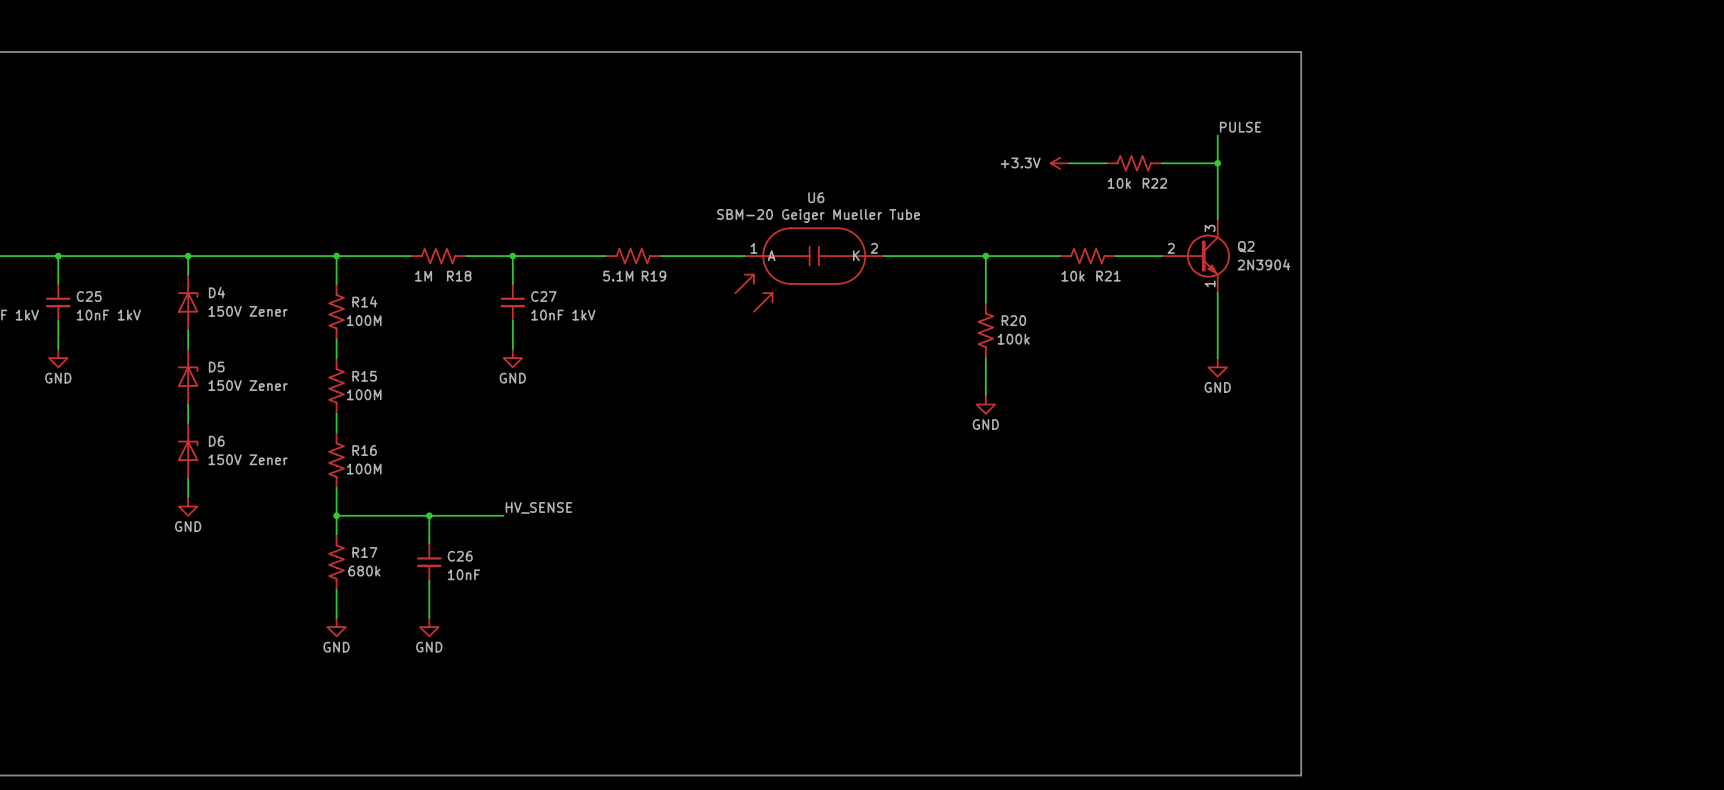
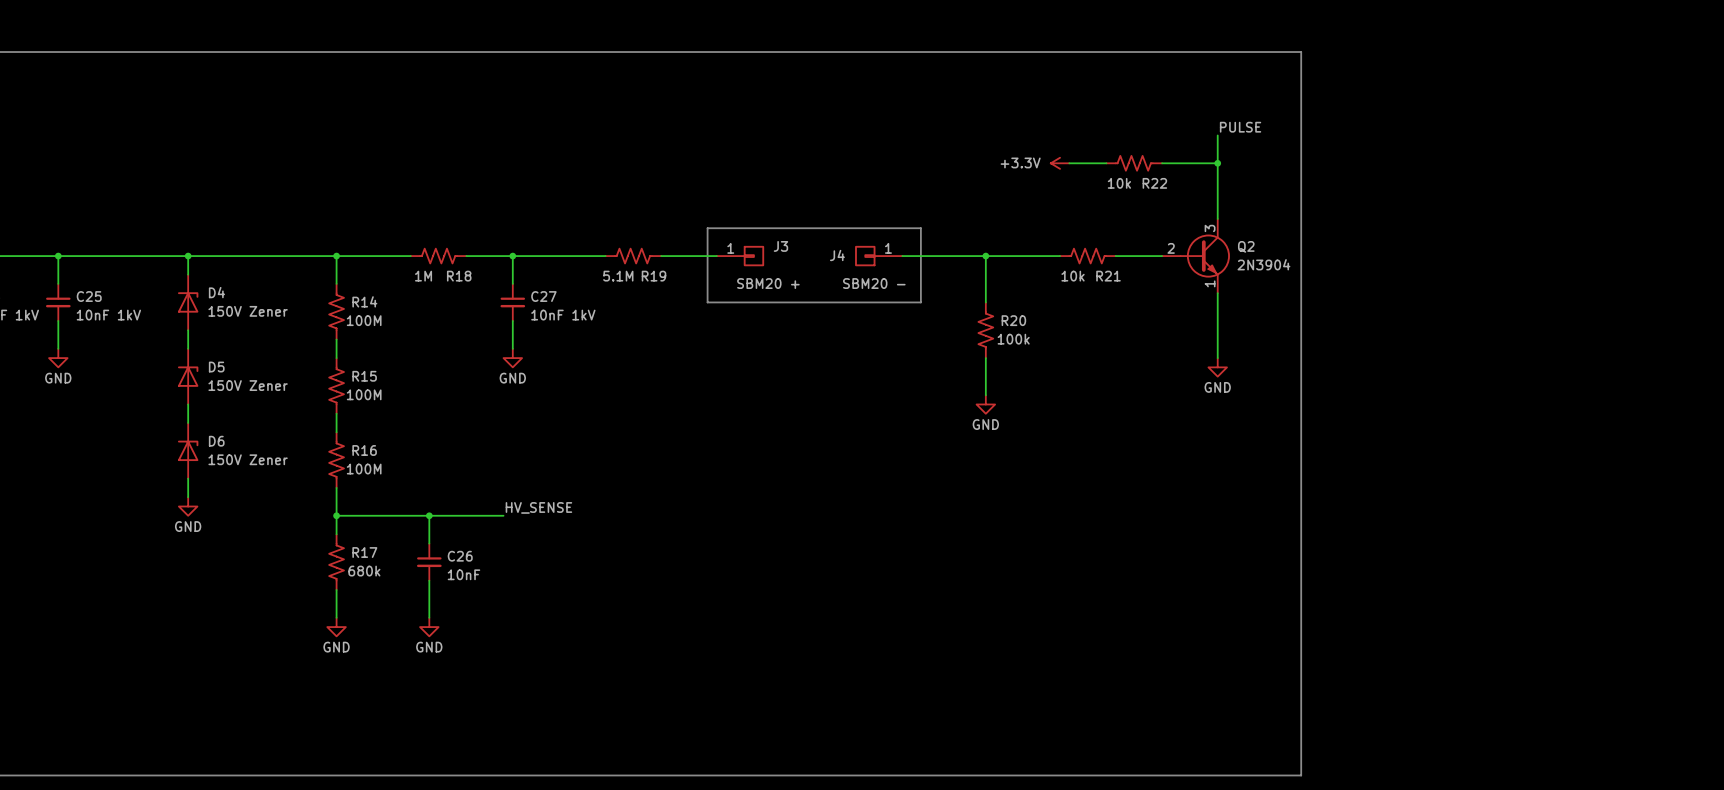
line: none -> (707, 228) (920, 228) (920, 302) (707, 302) (707, 228)
J3: none -> SBM20 + (740, 256)
J4: none -> SBM20 - (878, 256)
U6: SBM-20 Geiger Mueller Tube (809, 269) -> none

